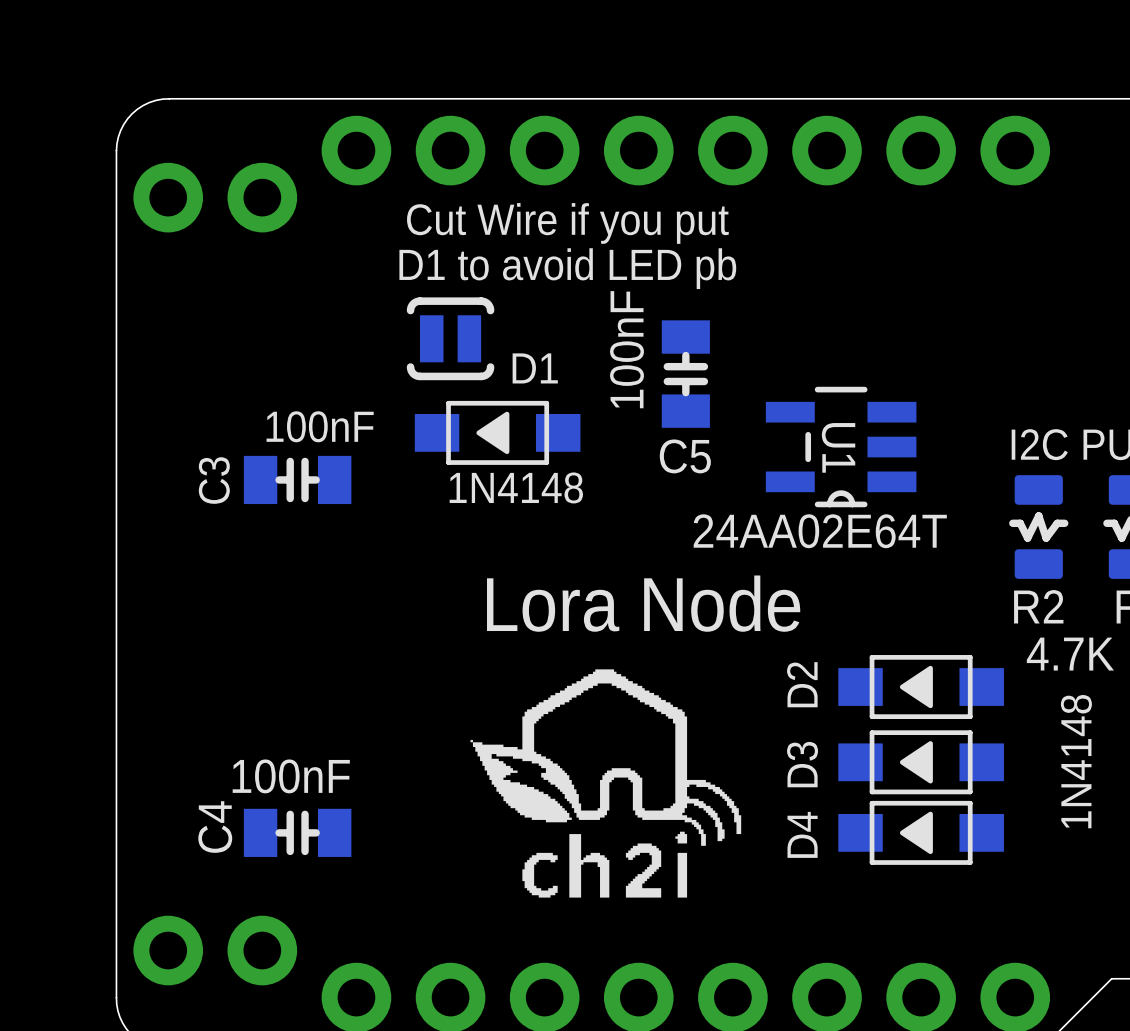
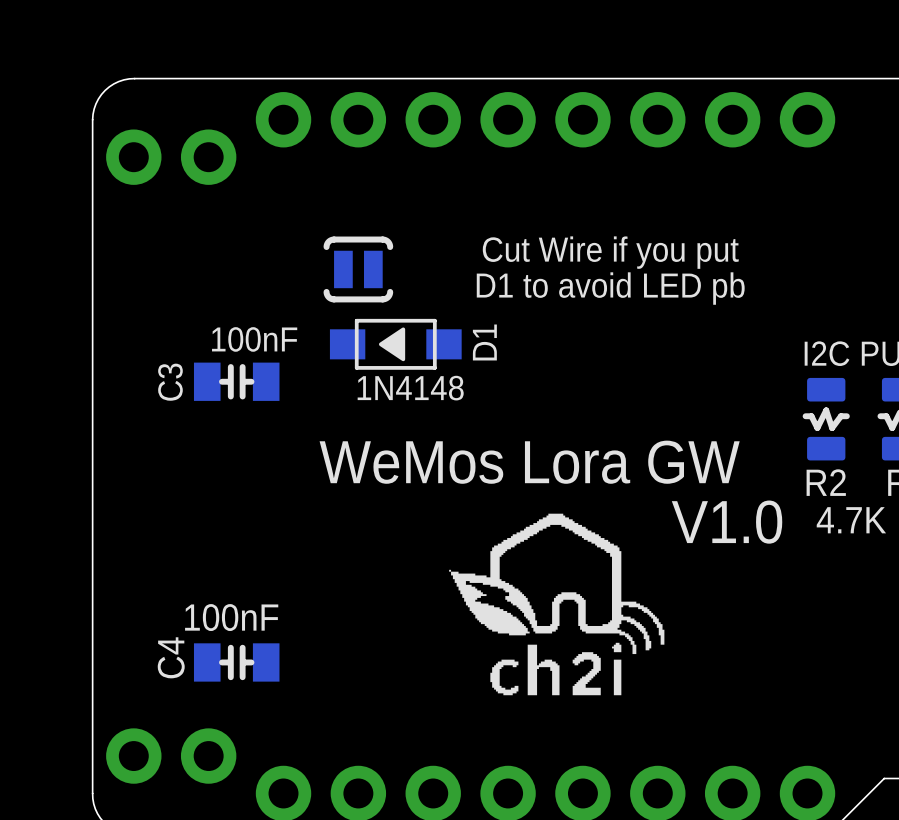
text position: Cut Wire if you put (567, 223) -> Cut Wire if you put (610, 252)
text position: D1 to avoid LED pb (567, 268) -> D1 to avoid LED pb (610, 288)
D1 name rotation: 0° (535, 368) -> 90° counterclockwise (484, 342)
D1 name position: D1 (535, 368) -> D1 (484, 342)
C5: 100nF (685, 374) -> none
U1: 24AA02E64T (841, 447) -> none
text: Lora Node (643, 603) -> WeMos Lora GW (529, 462)
text: none -> V1.0 (727, 522)
D2: (921, 687) -> none
D3: (921, 762) -> none
drawing position: (605, 783) -> (556, 604)
D4: 1N4148 (921, 832) -> none

